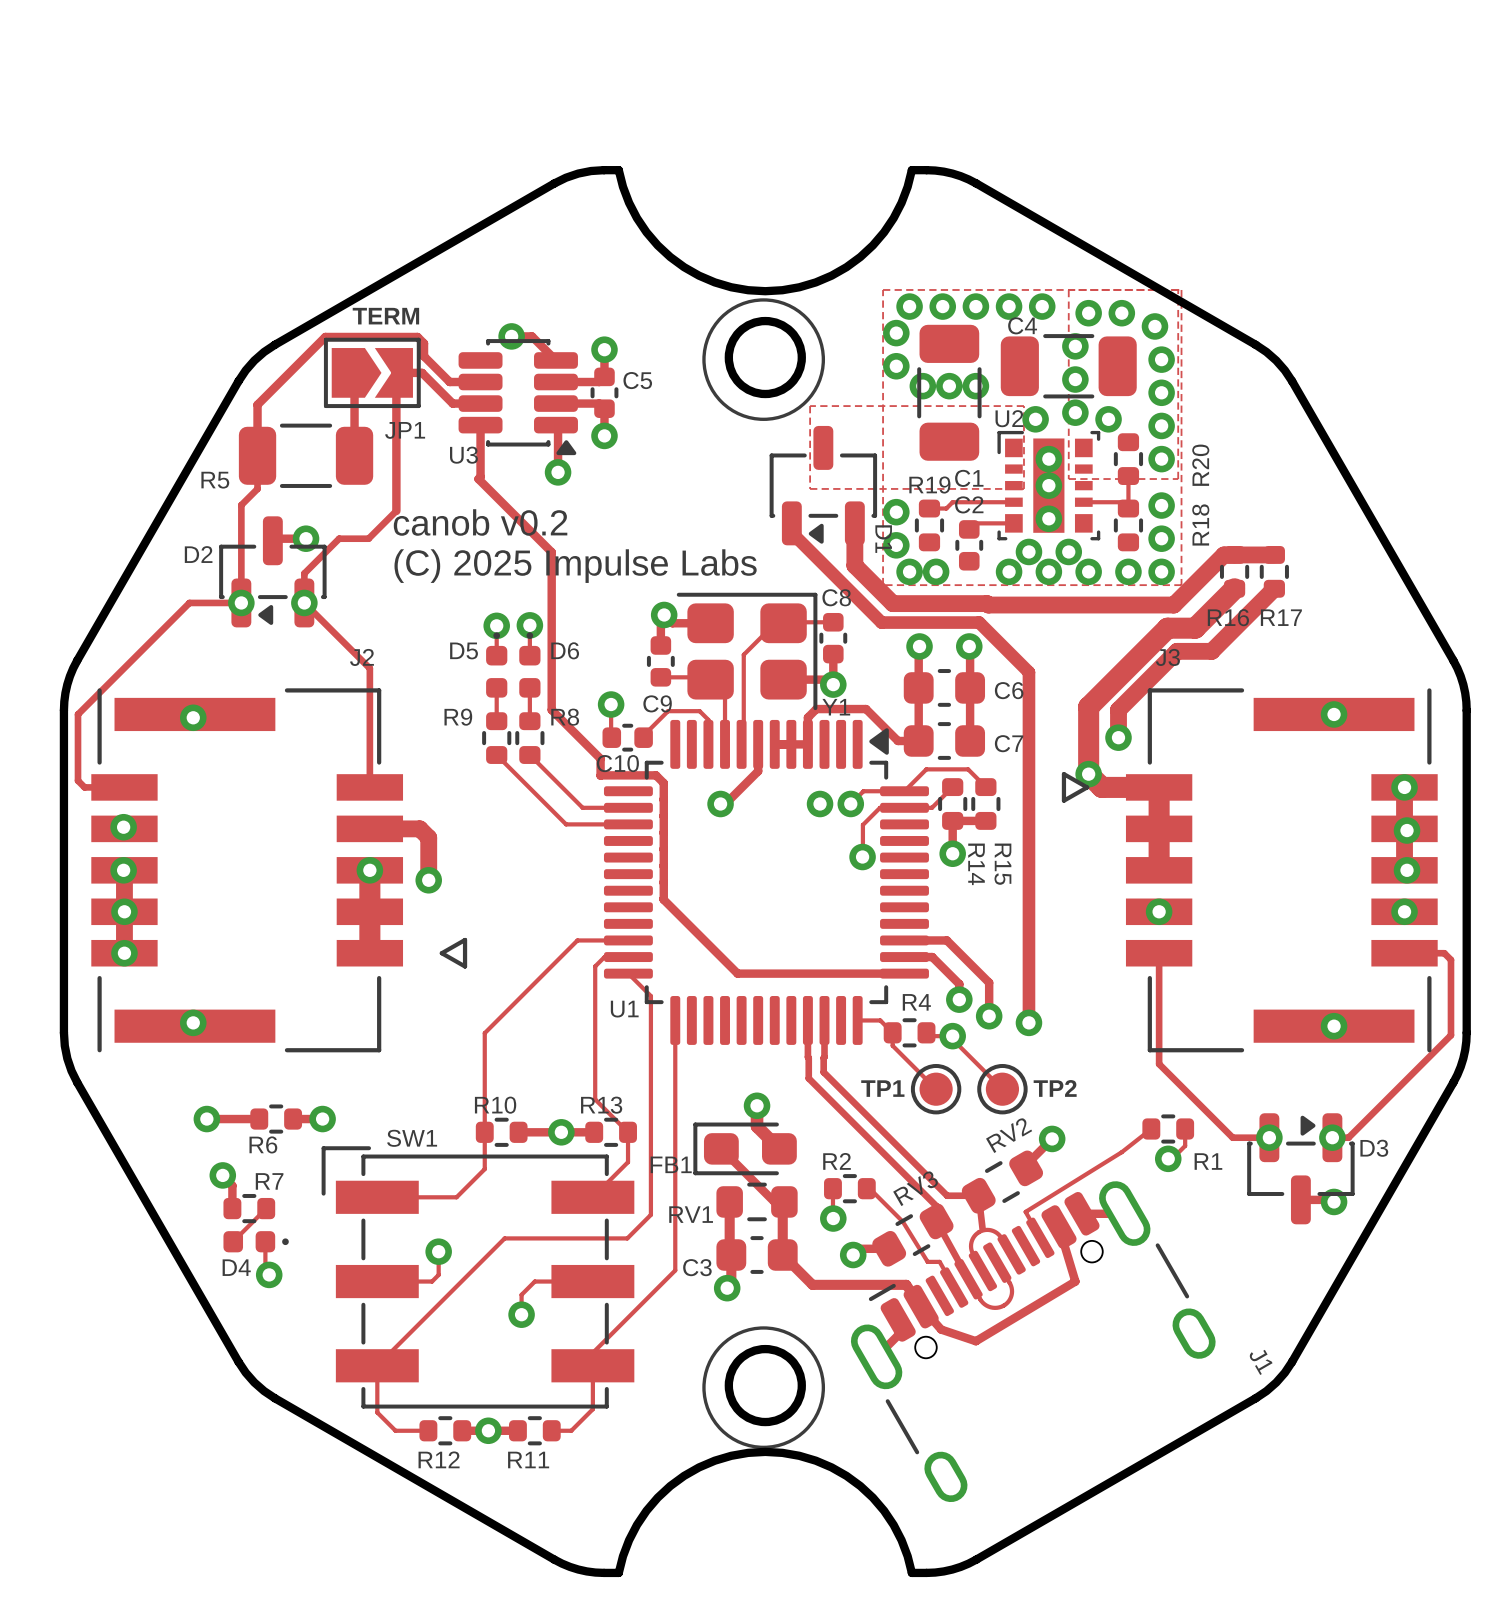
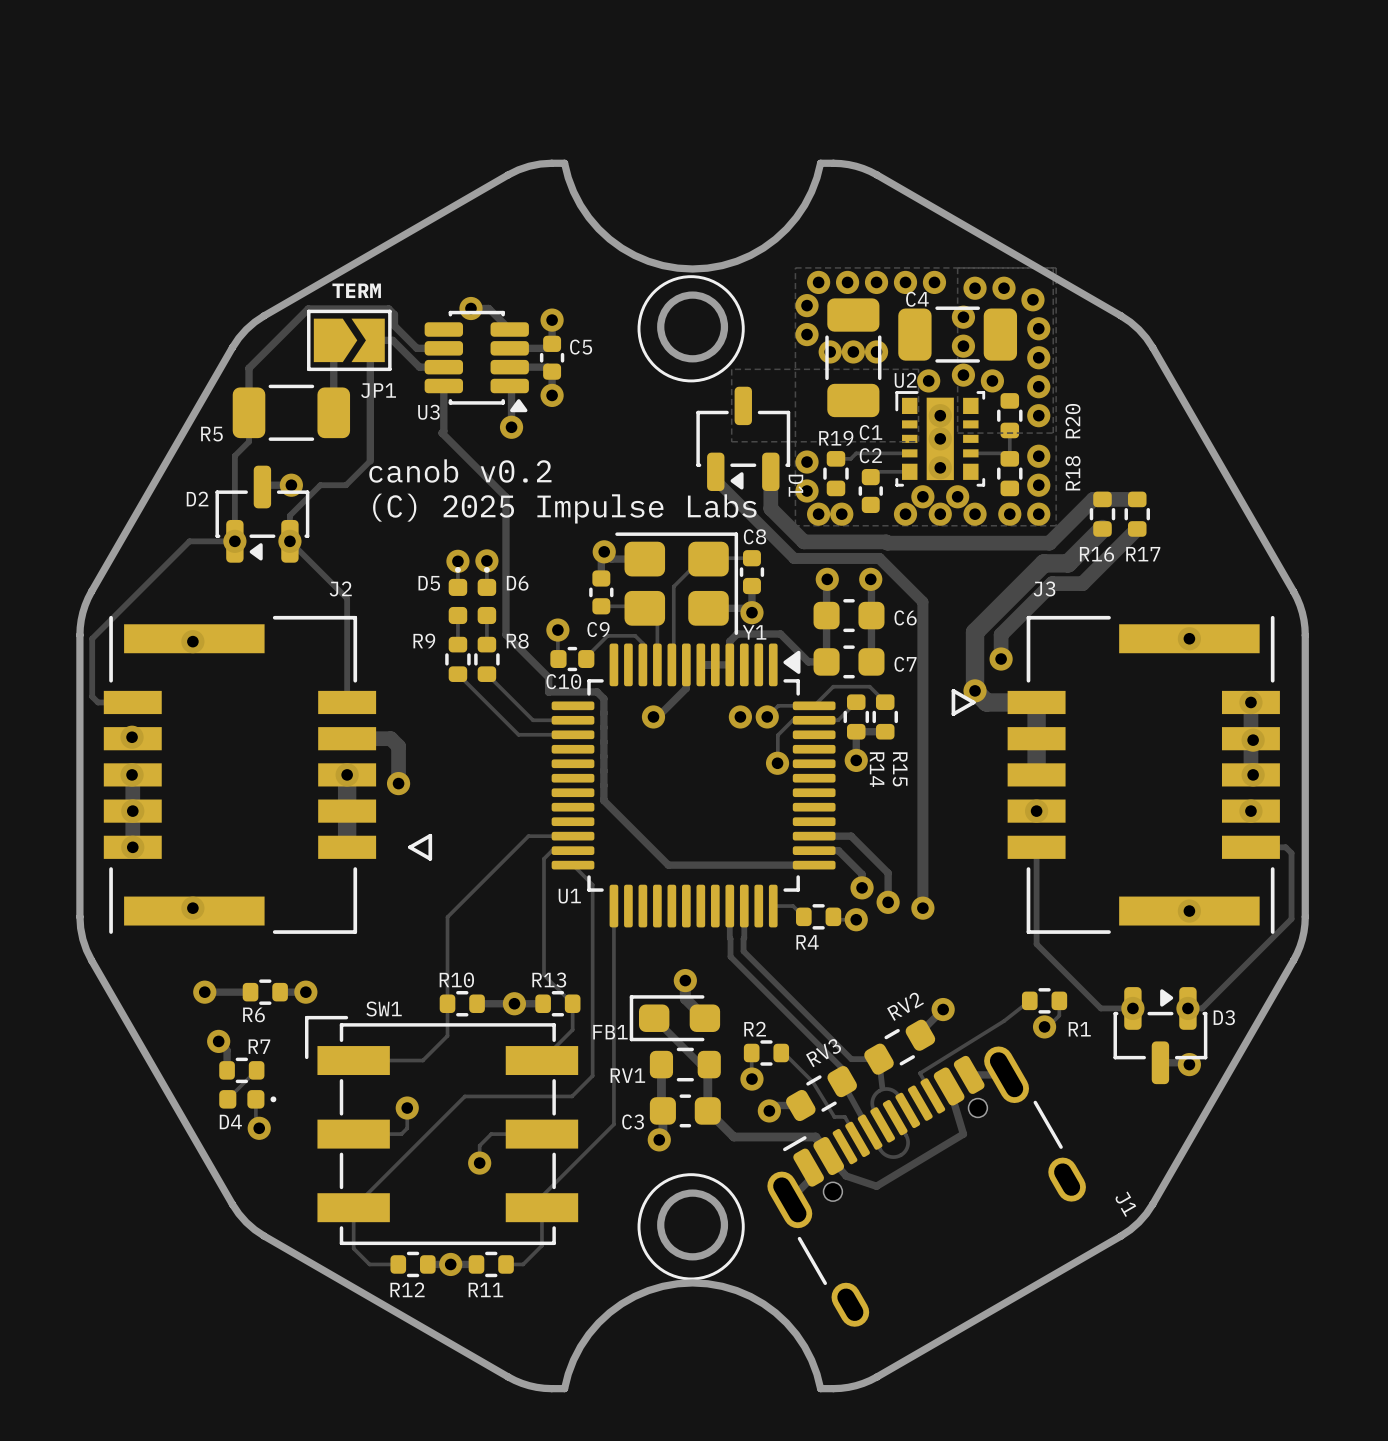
R4 name position: R4 (916, 1002) -> R4 (807, 942)
track: (892, 1032) (892, 1045) (936, 1089) -> none
track: (952, 1036) (952, 1039) (1002, 1089) -> none
TP1: (936, 1089) -> none
TP2: (1002, 1089) -> none

